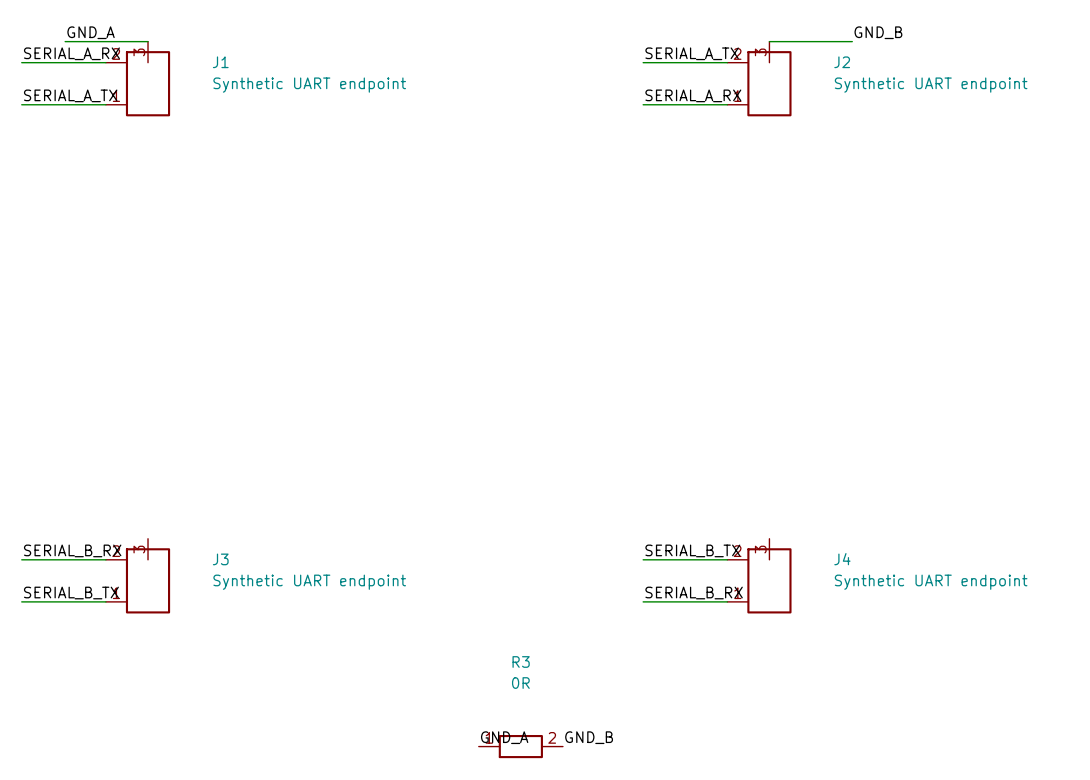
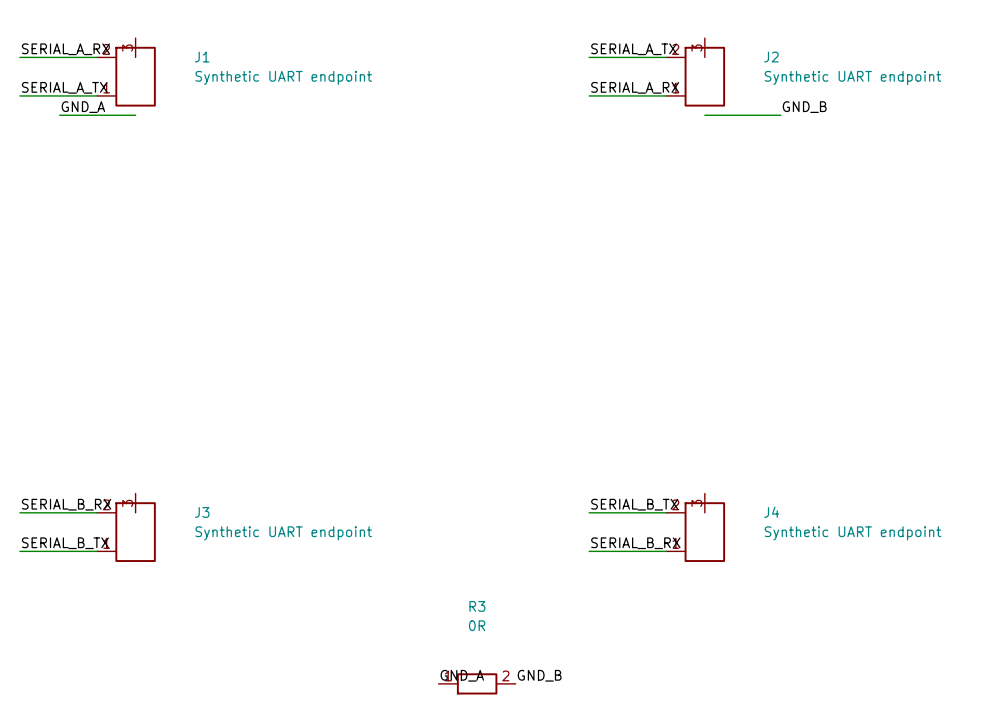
label position: GND_A (91, 32) -> GND_A (83, 107)
label position: GND_B (878, 32) -> GND_B (804, 107)
wire: (65, 41) (148, 41) -> (59, 115) (135, 115)
wire: (769, 41) (852, 41) -> (704, 115) (780, 115)

